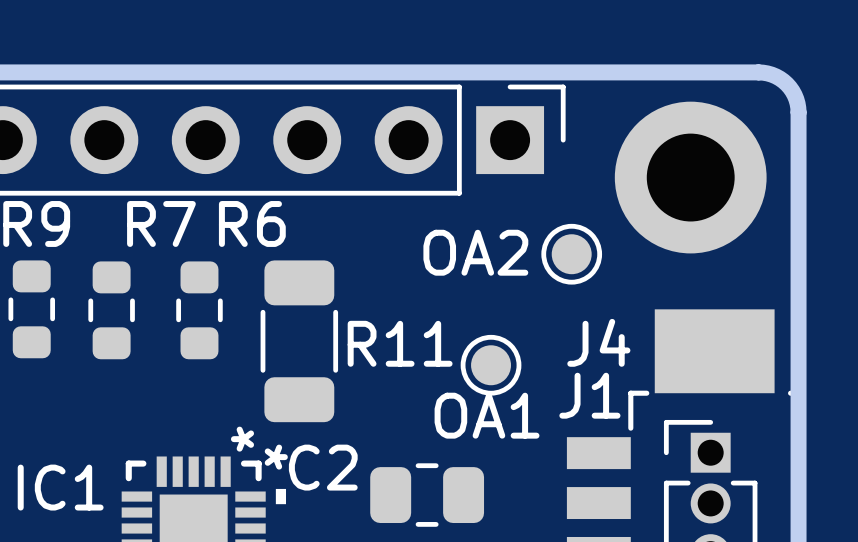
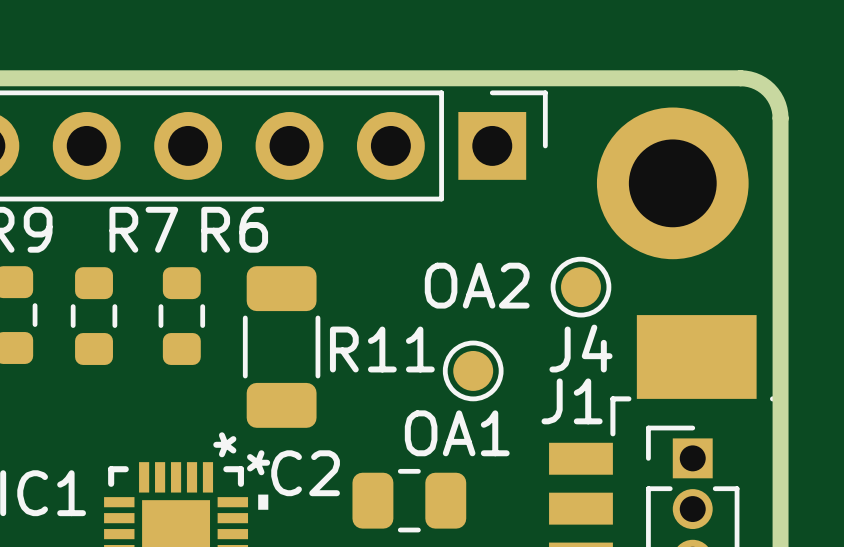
OA2 text: OA2 (475, 252) -> none
OA2 position: (571, 254) -> (580, 287)
OA2 name: none -> OA2 (477, 285)
OA1 text: OA1 (487, 415) -> none
OA1 name: none -> OA1 (457, 433)

